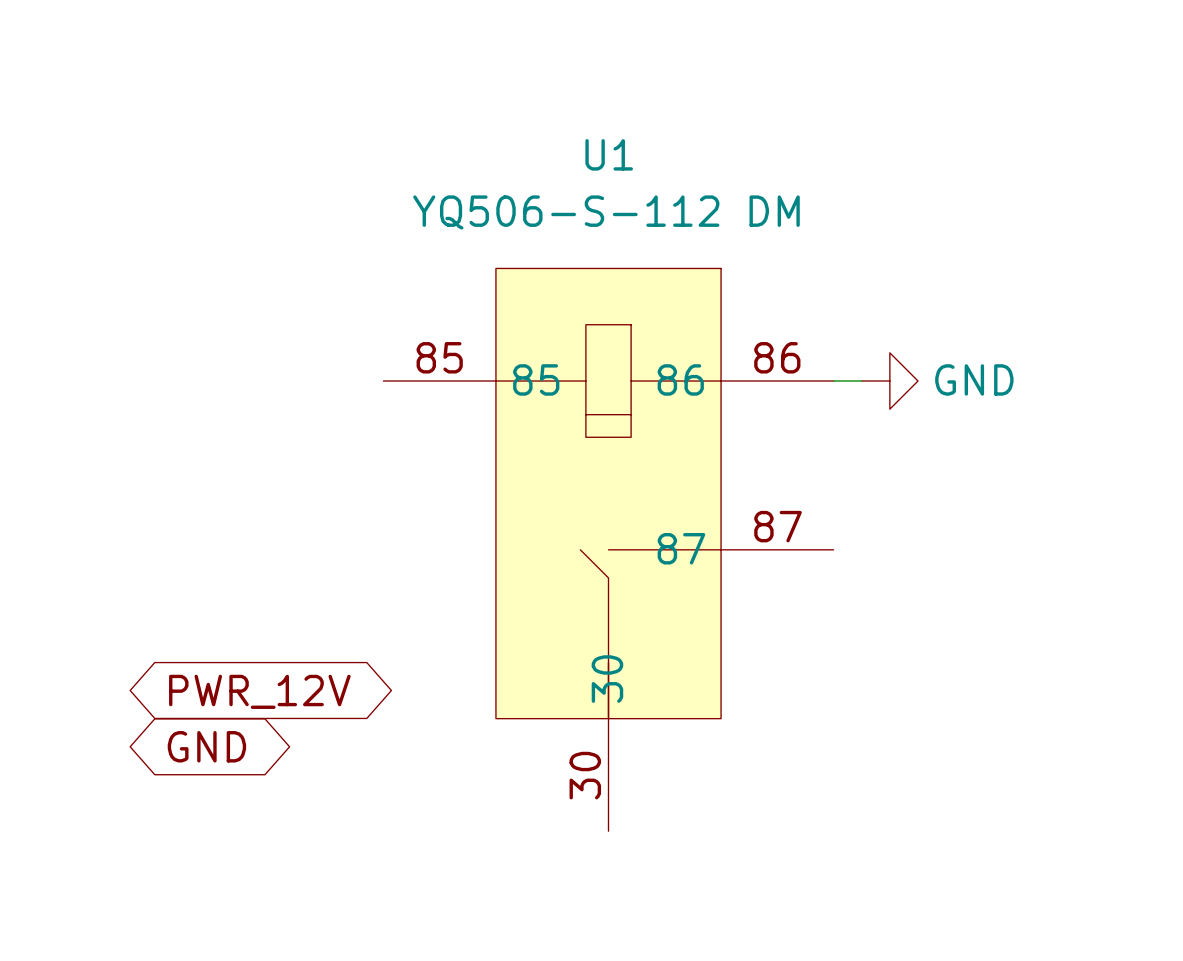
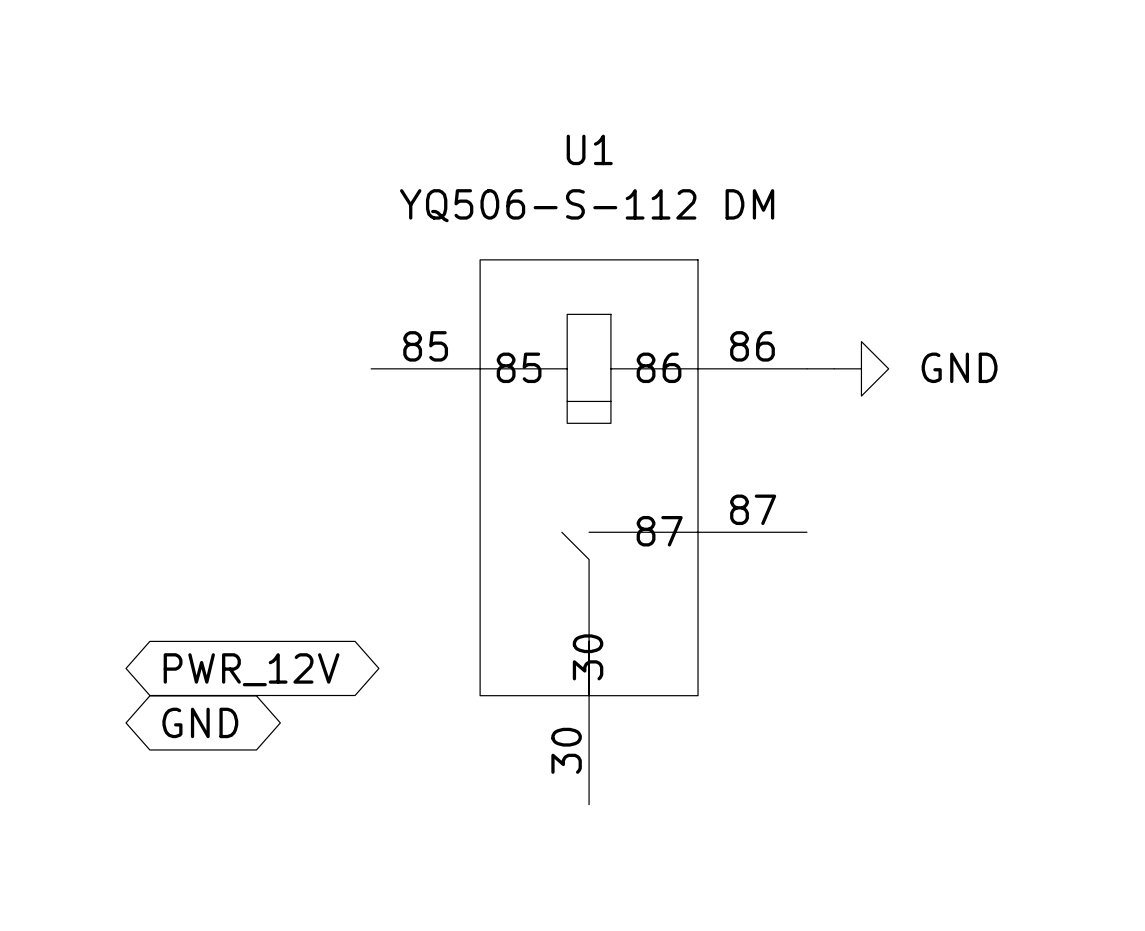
power symbol text position: GND (974, 379) -> GND (959, 367)

